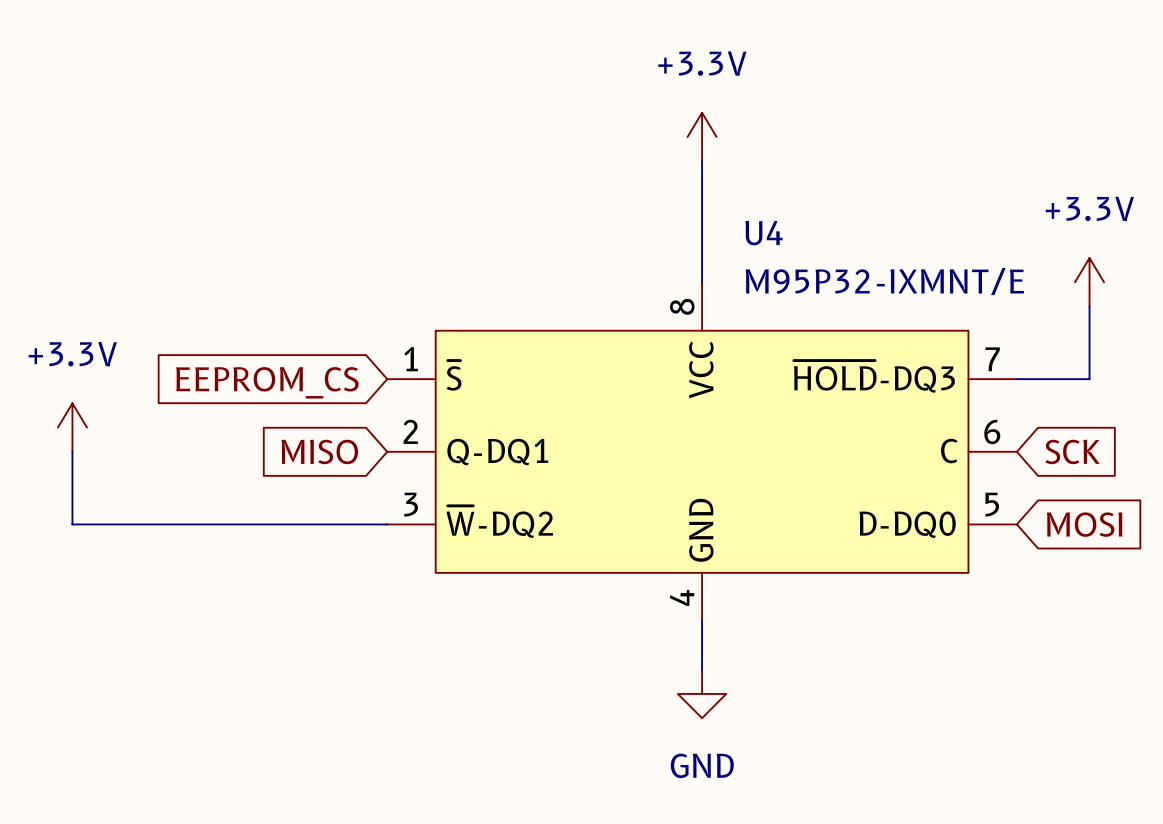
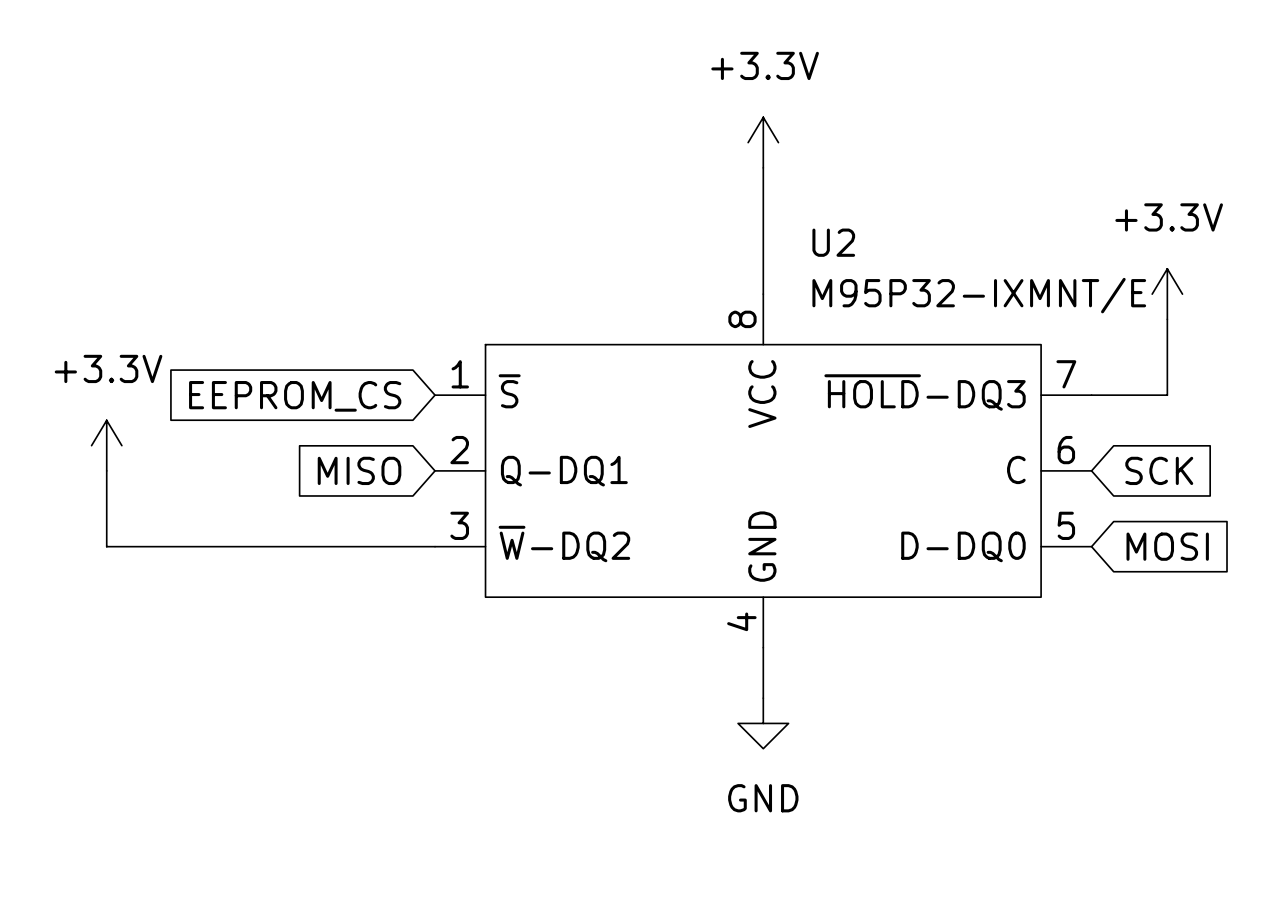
U4 name: U4 (764, 233) -> U2 (833, 242)

